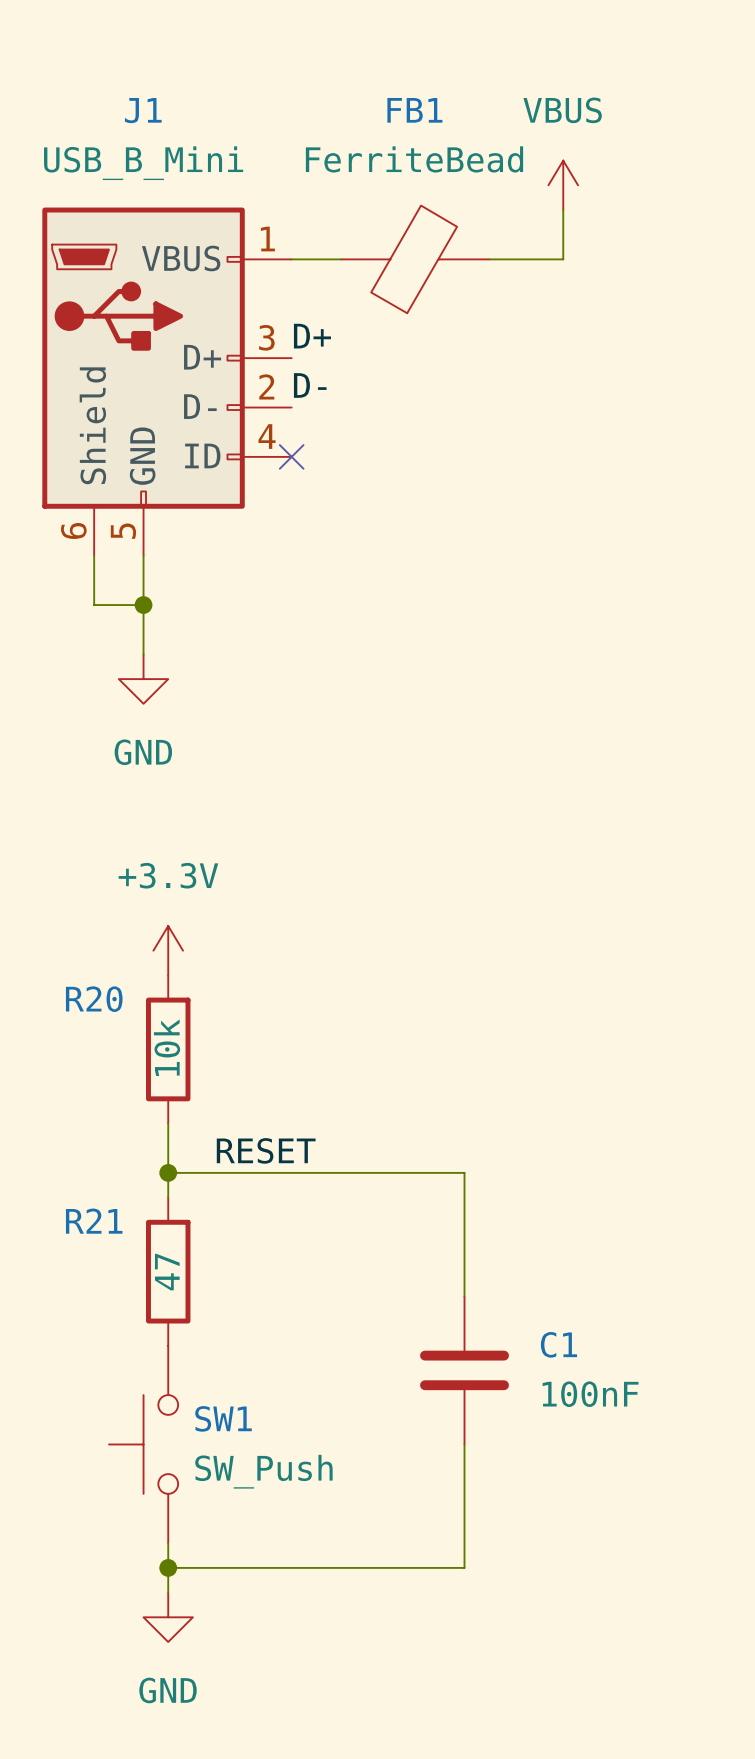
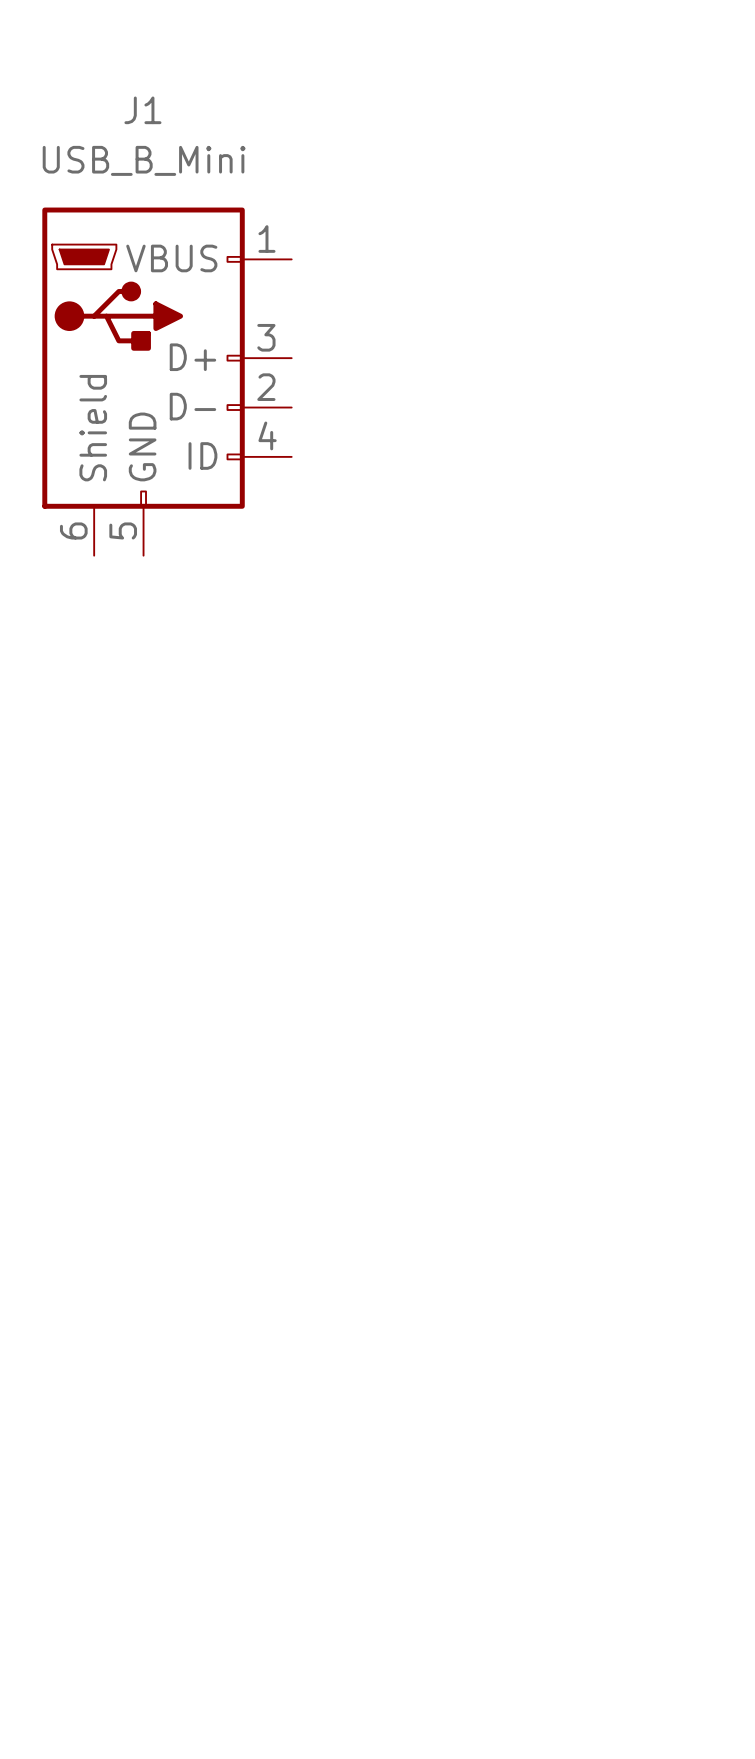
power symbol: VBUS (563, 185) -> none
wire: (563, 210) (563, 259) (489, 259) -> none
wire: (291, 259) (341, 259) -> none
FB1: FerriteBead (415, 259) -> none
label: D+ (312, 336) -> none
label: D- (310, 385) -> none
no-connect mark: (291, 456) -> none
wire: (94, 555) (94, 605) (143, 605) -> none
wire: (143, 555) (143, 654) -> none
junction: (143, 605) -> none
power symbol: GND (143, 679) -> none
power symbol: +3.3V (168, 950) -> none
R20: 10k (168, 1049) -> none
wire: (168, 1123) (168, 1197) -> none
label: RESET (266, 1150) -> none
wire: (168, 1172) (464, 1172) (464, 1296) -> none
junction: (168, 1172) -> none
R21: 47 (168, 1271) -> none
C1: 100nF (464, 1370) -> none
SW1: SW_Push (143, 1444) -> none
wire: (464, 1444) (464, 1567) (168, 1567) -> none
wire: (168, 1543) (168, 1592) -> none
junction: (168, 1567) -> none
power symbol: GND (168, 1617) -> none

